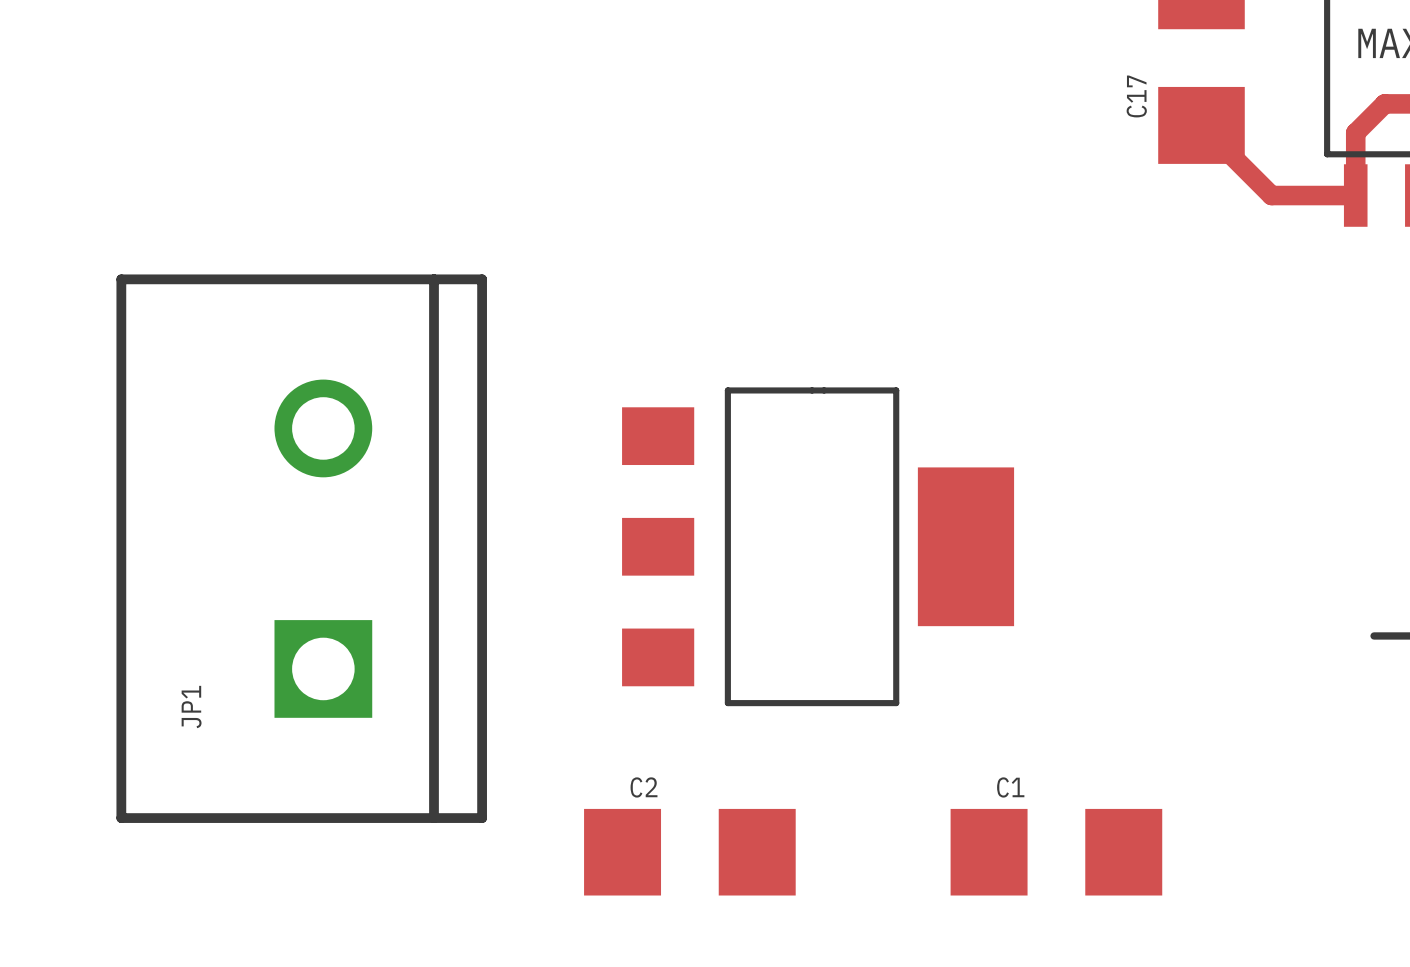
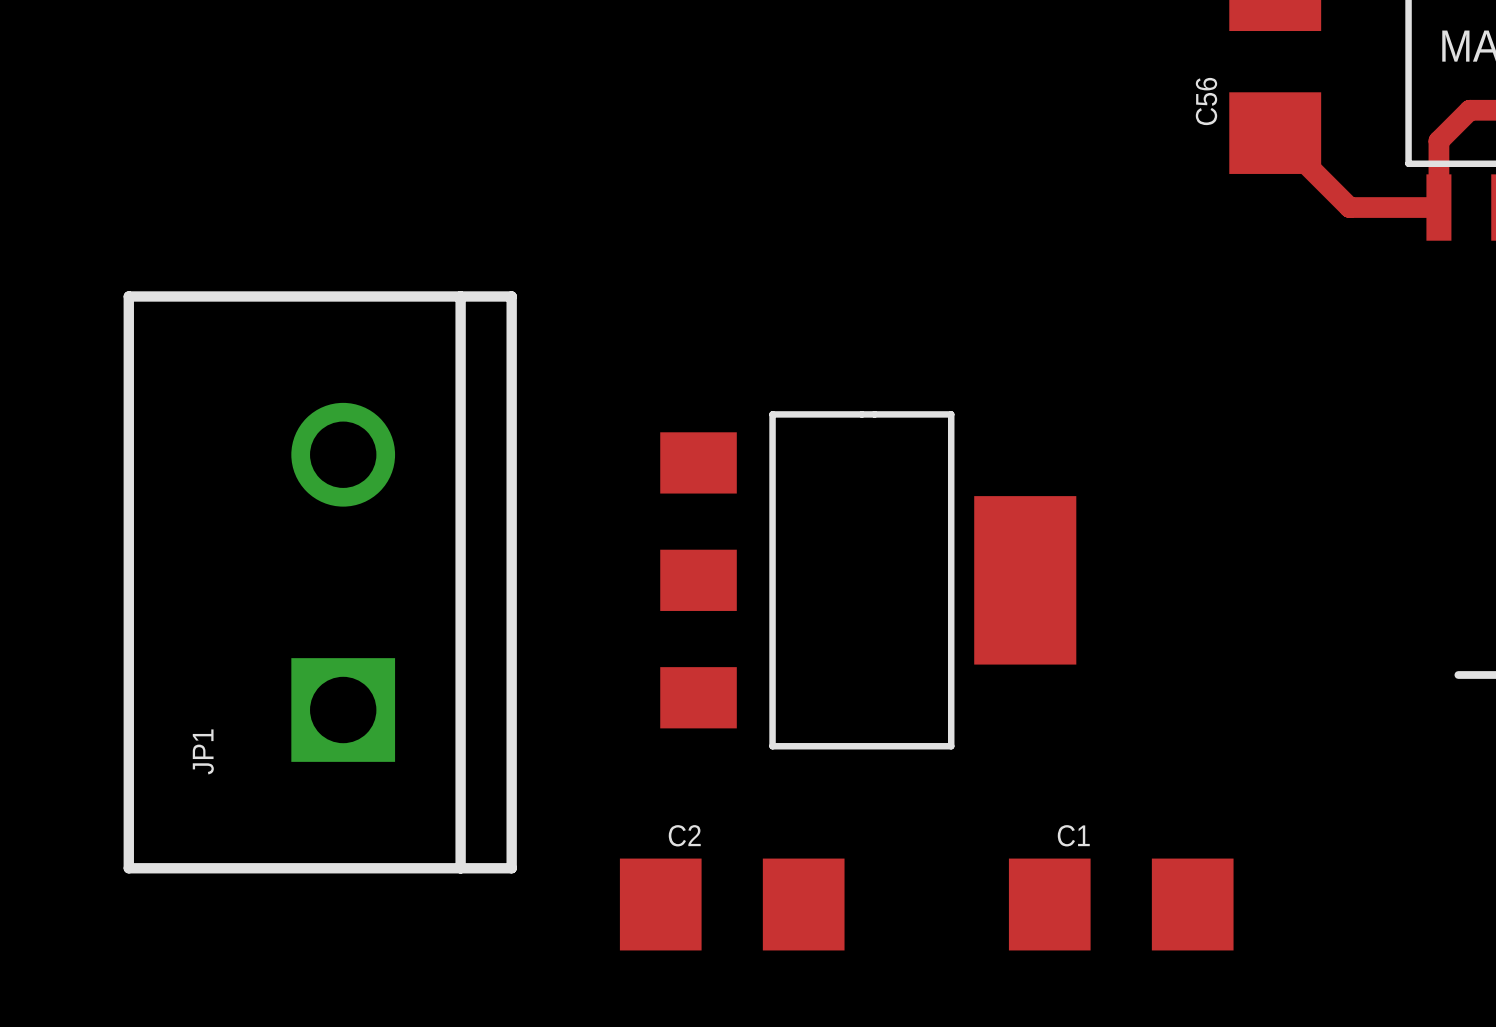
C17 name: C17 (1136, 96) -> C56 (1206, 101)

